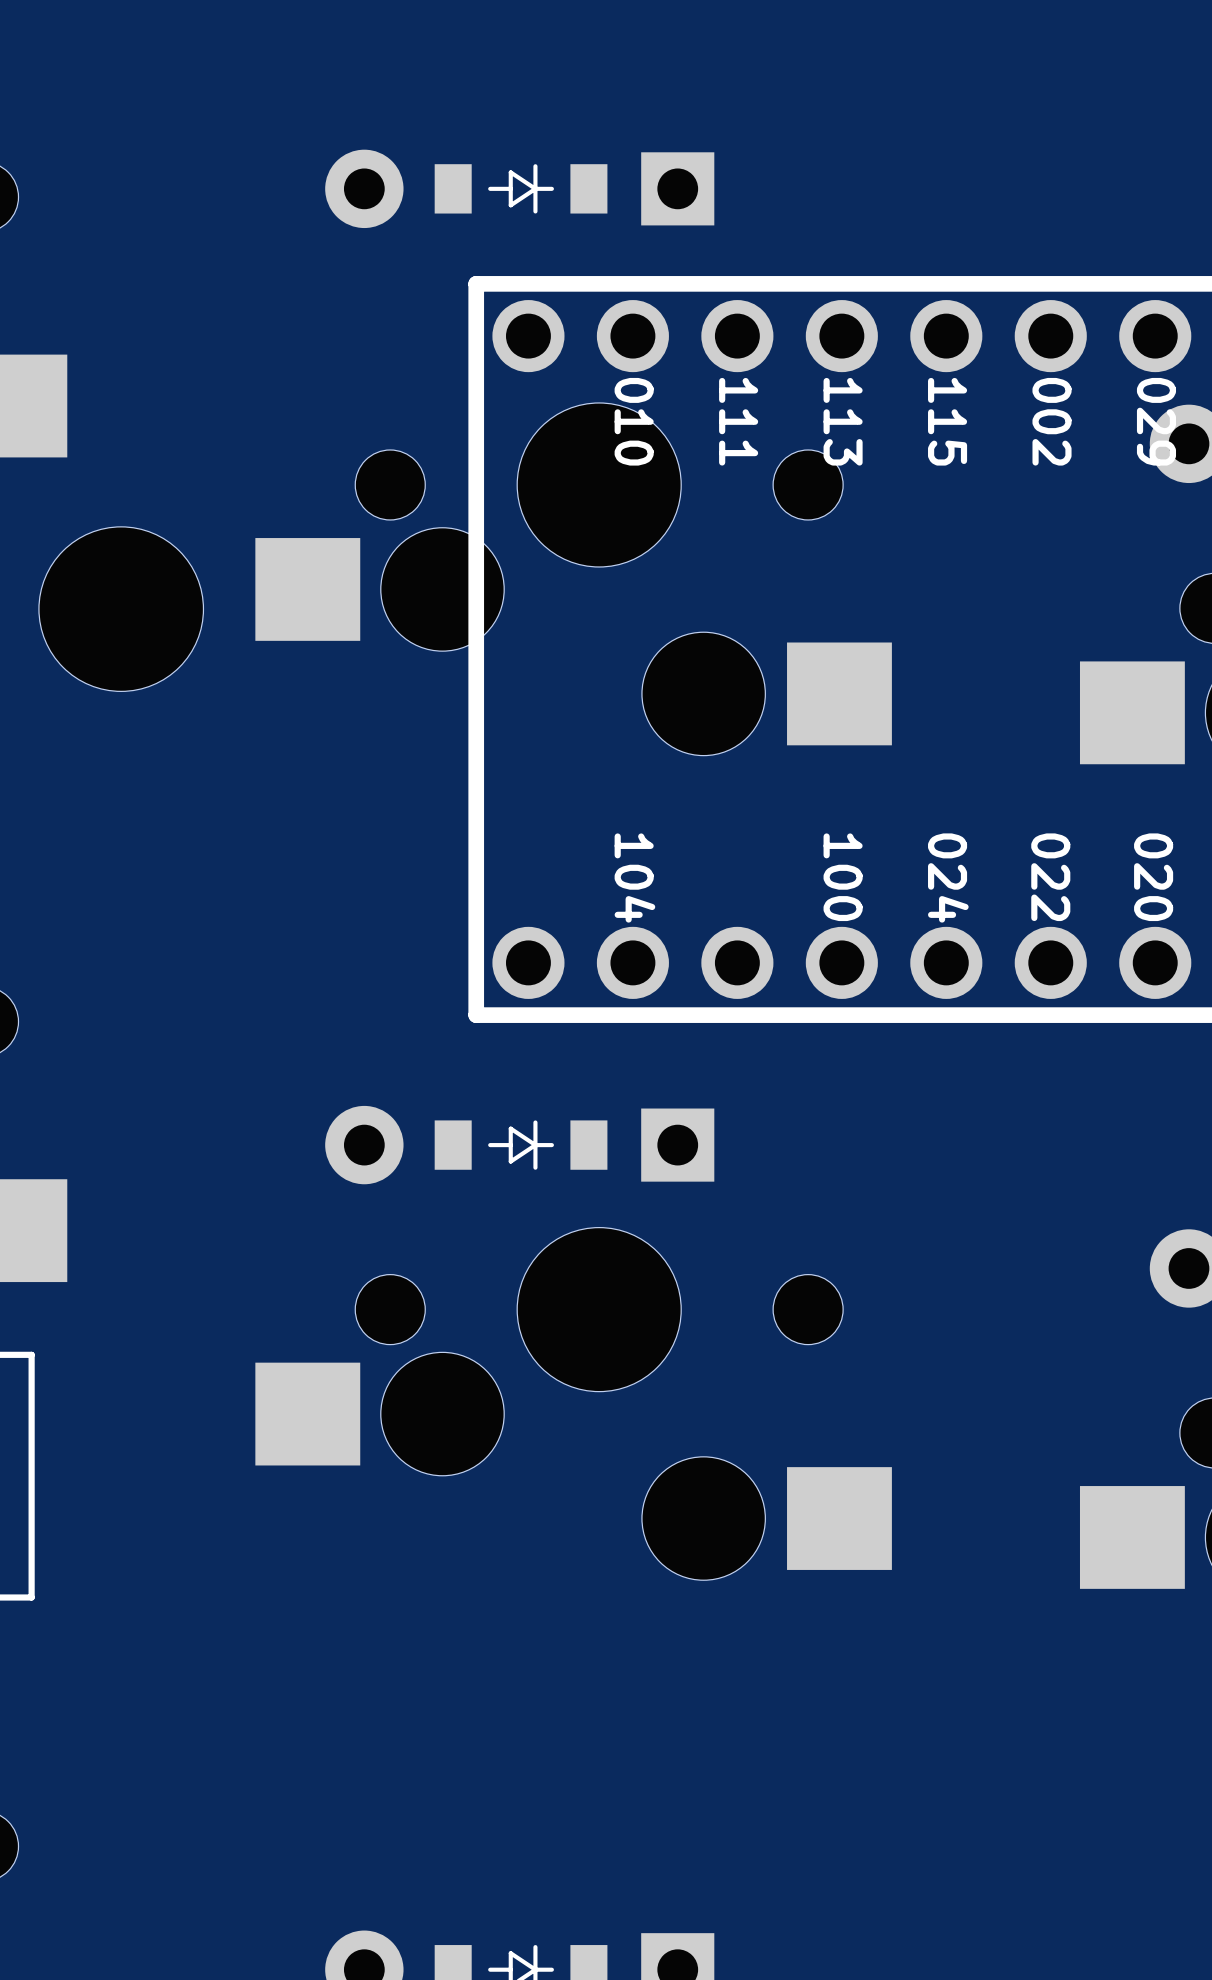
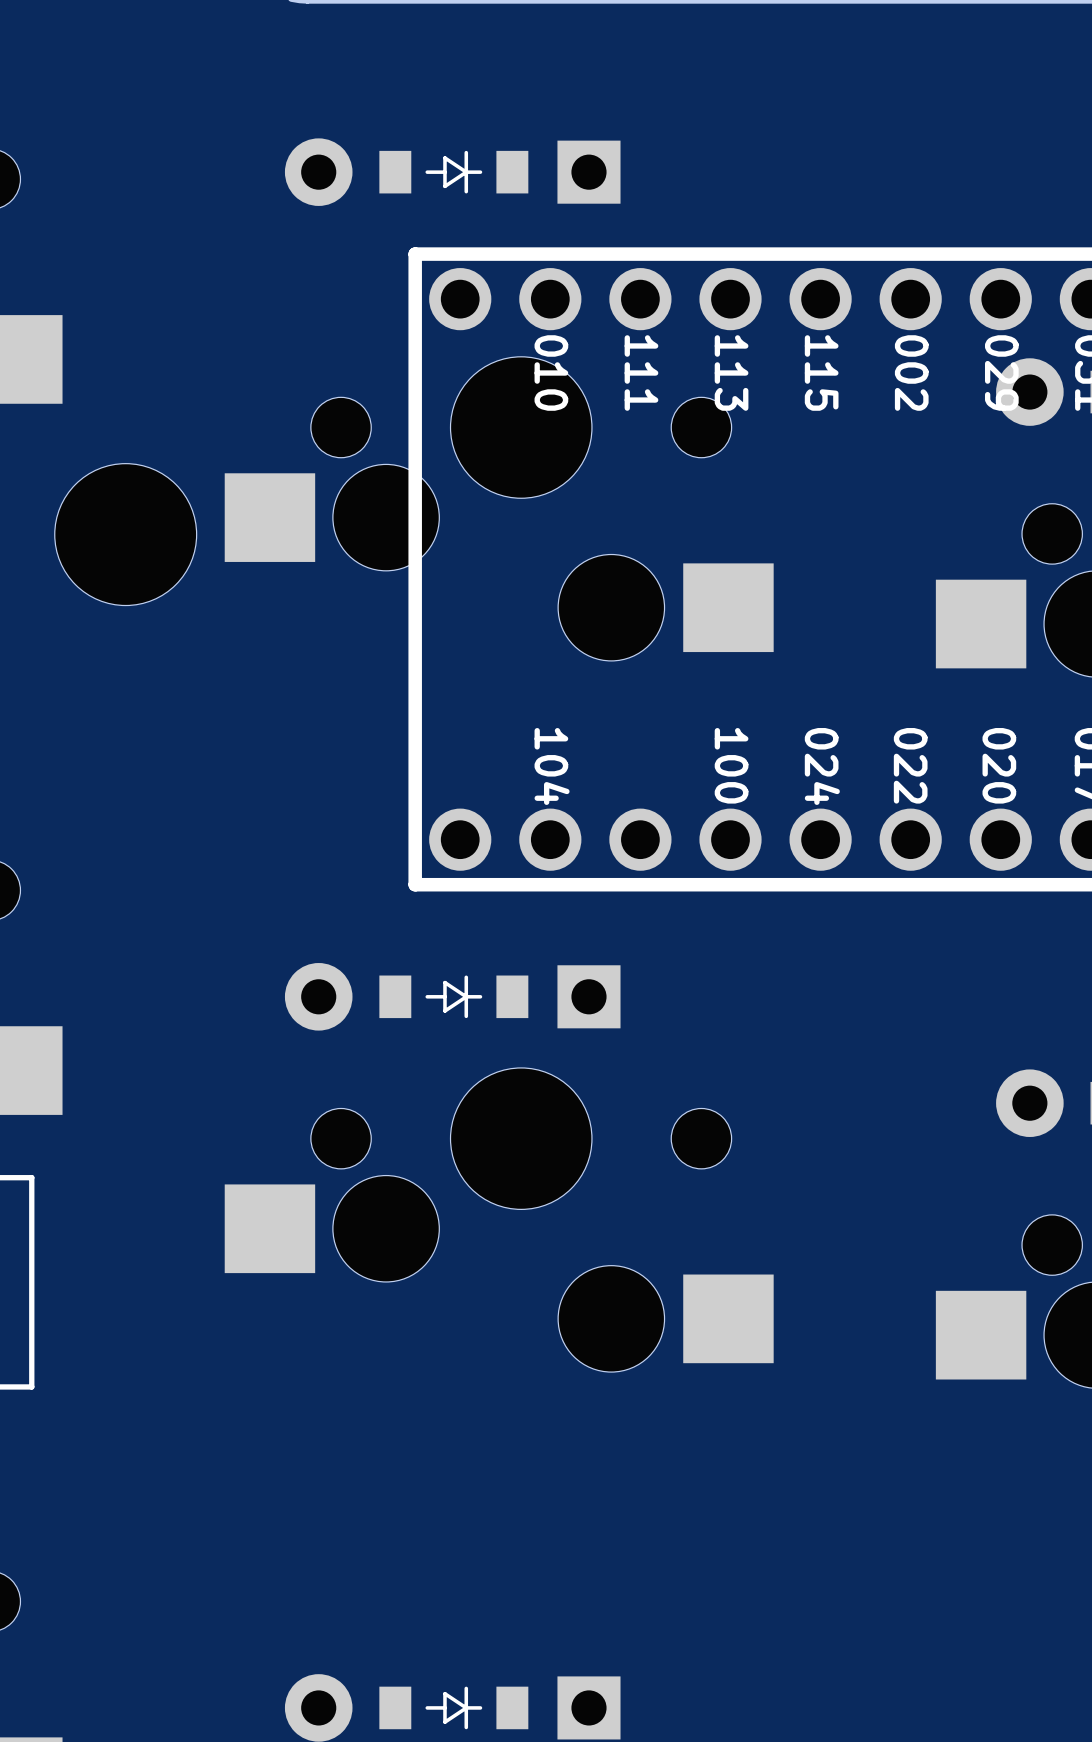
part position: (121, 609) -> (125, 534)

